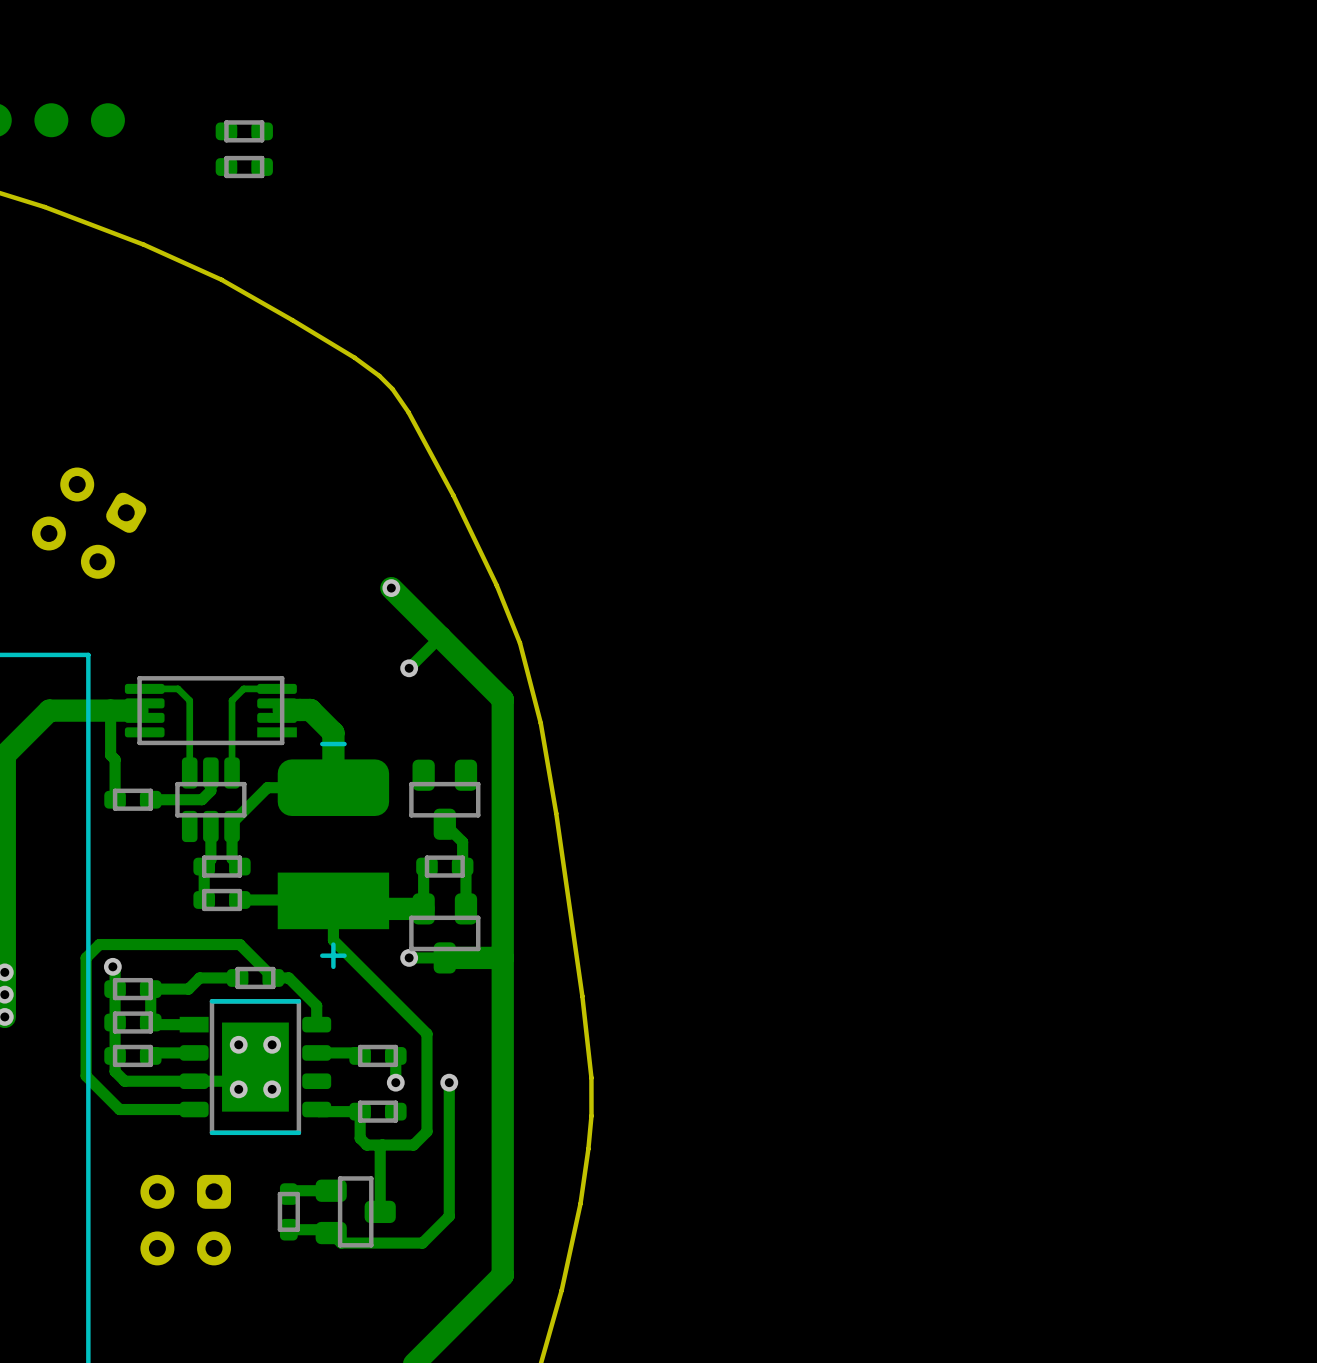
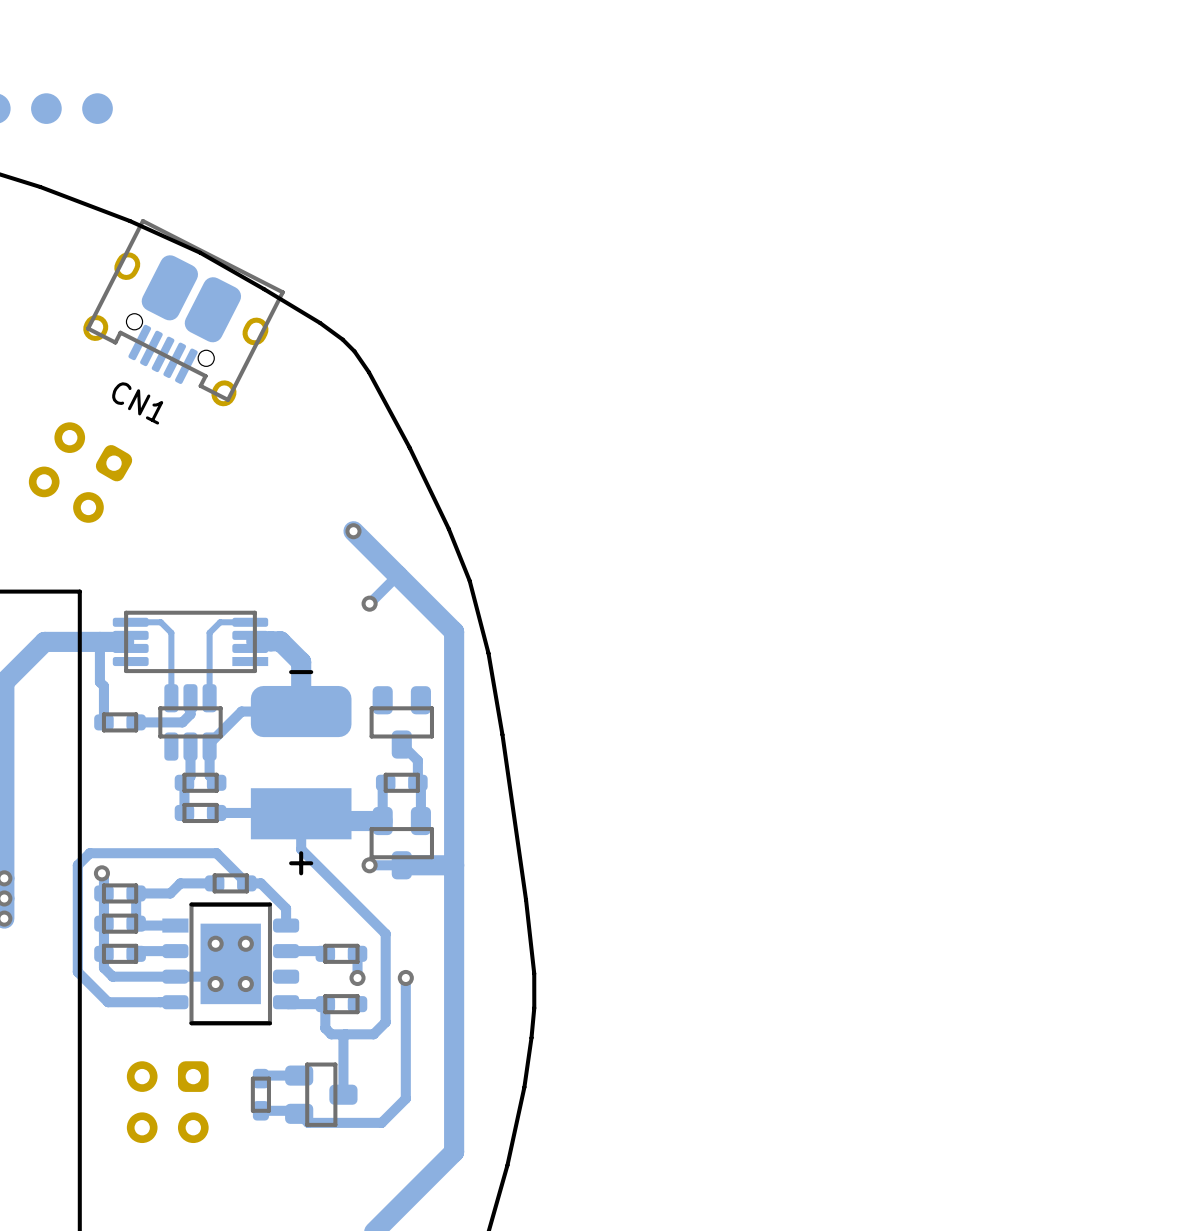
part: (244, 131) -> none
part: (244, 167) -> none
CN1: none -> (184, 312)

